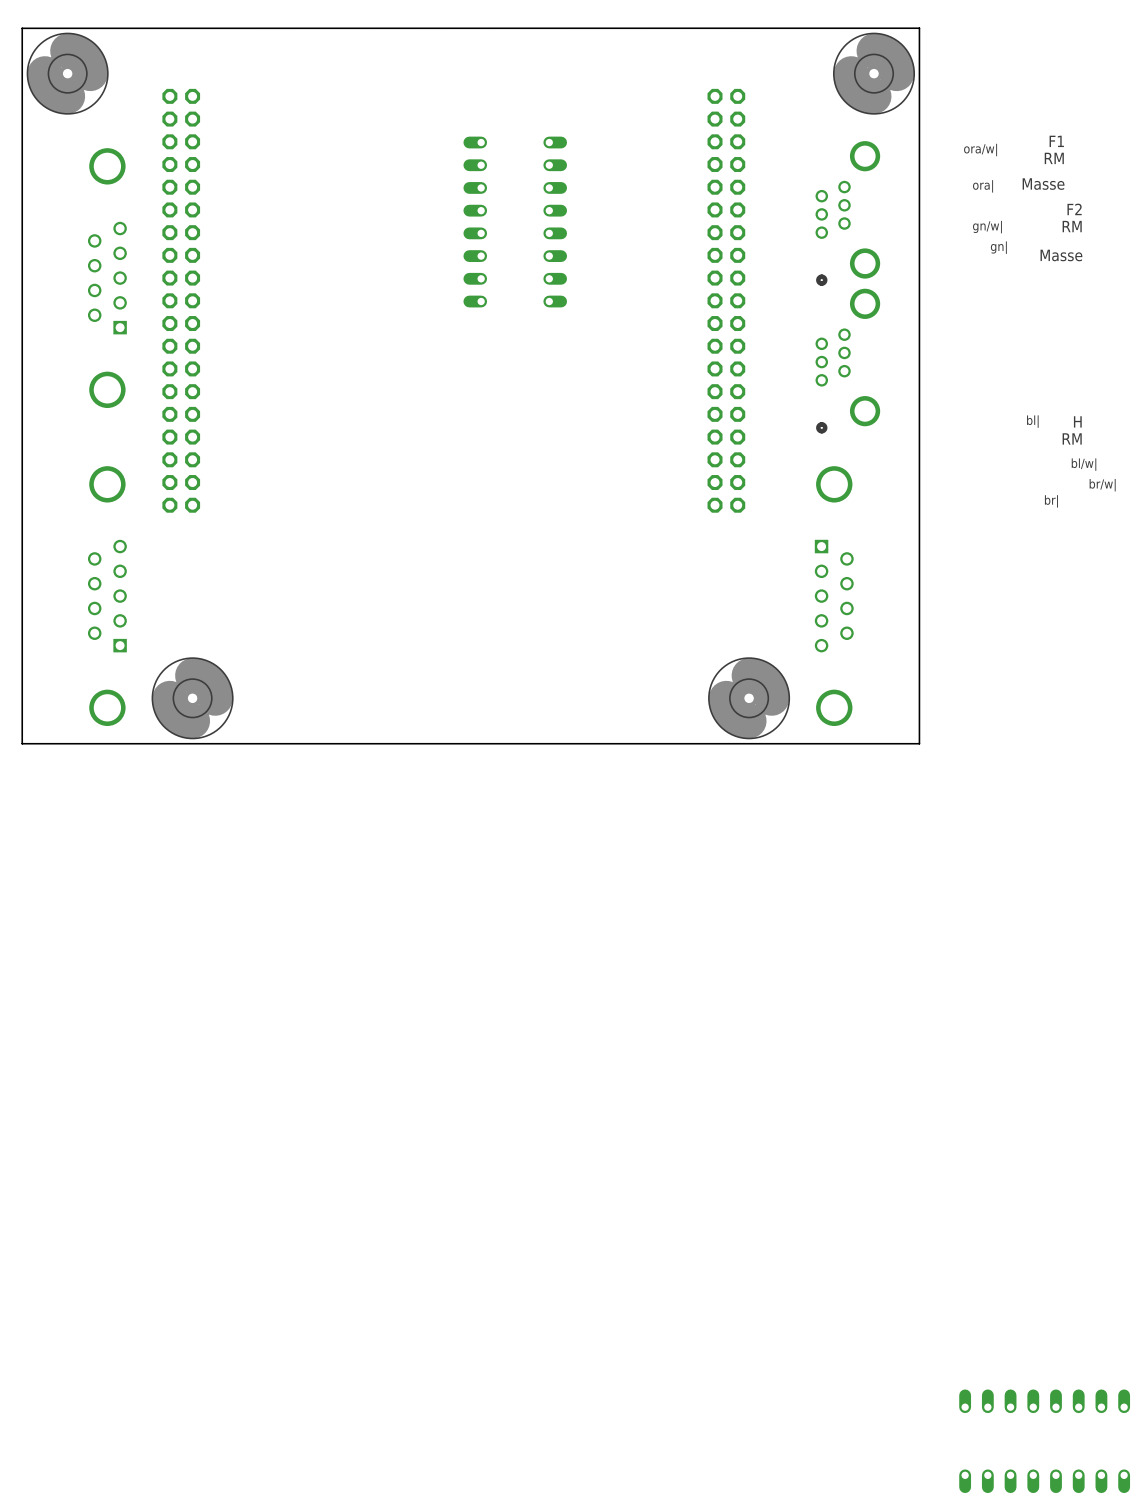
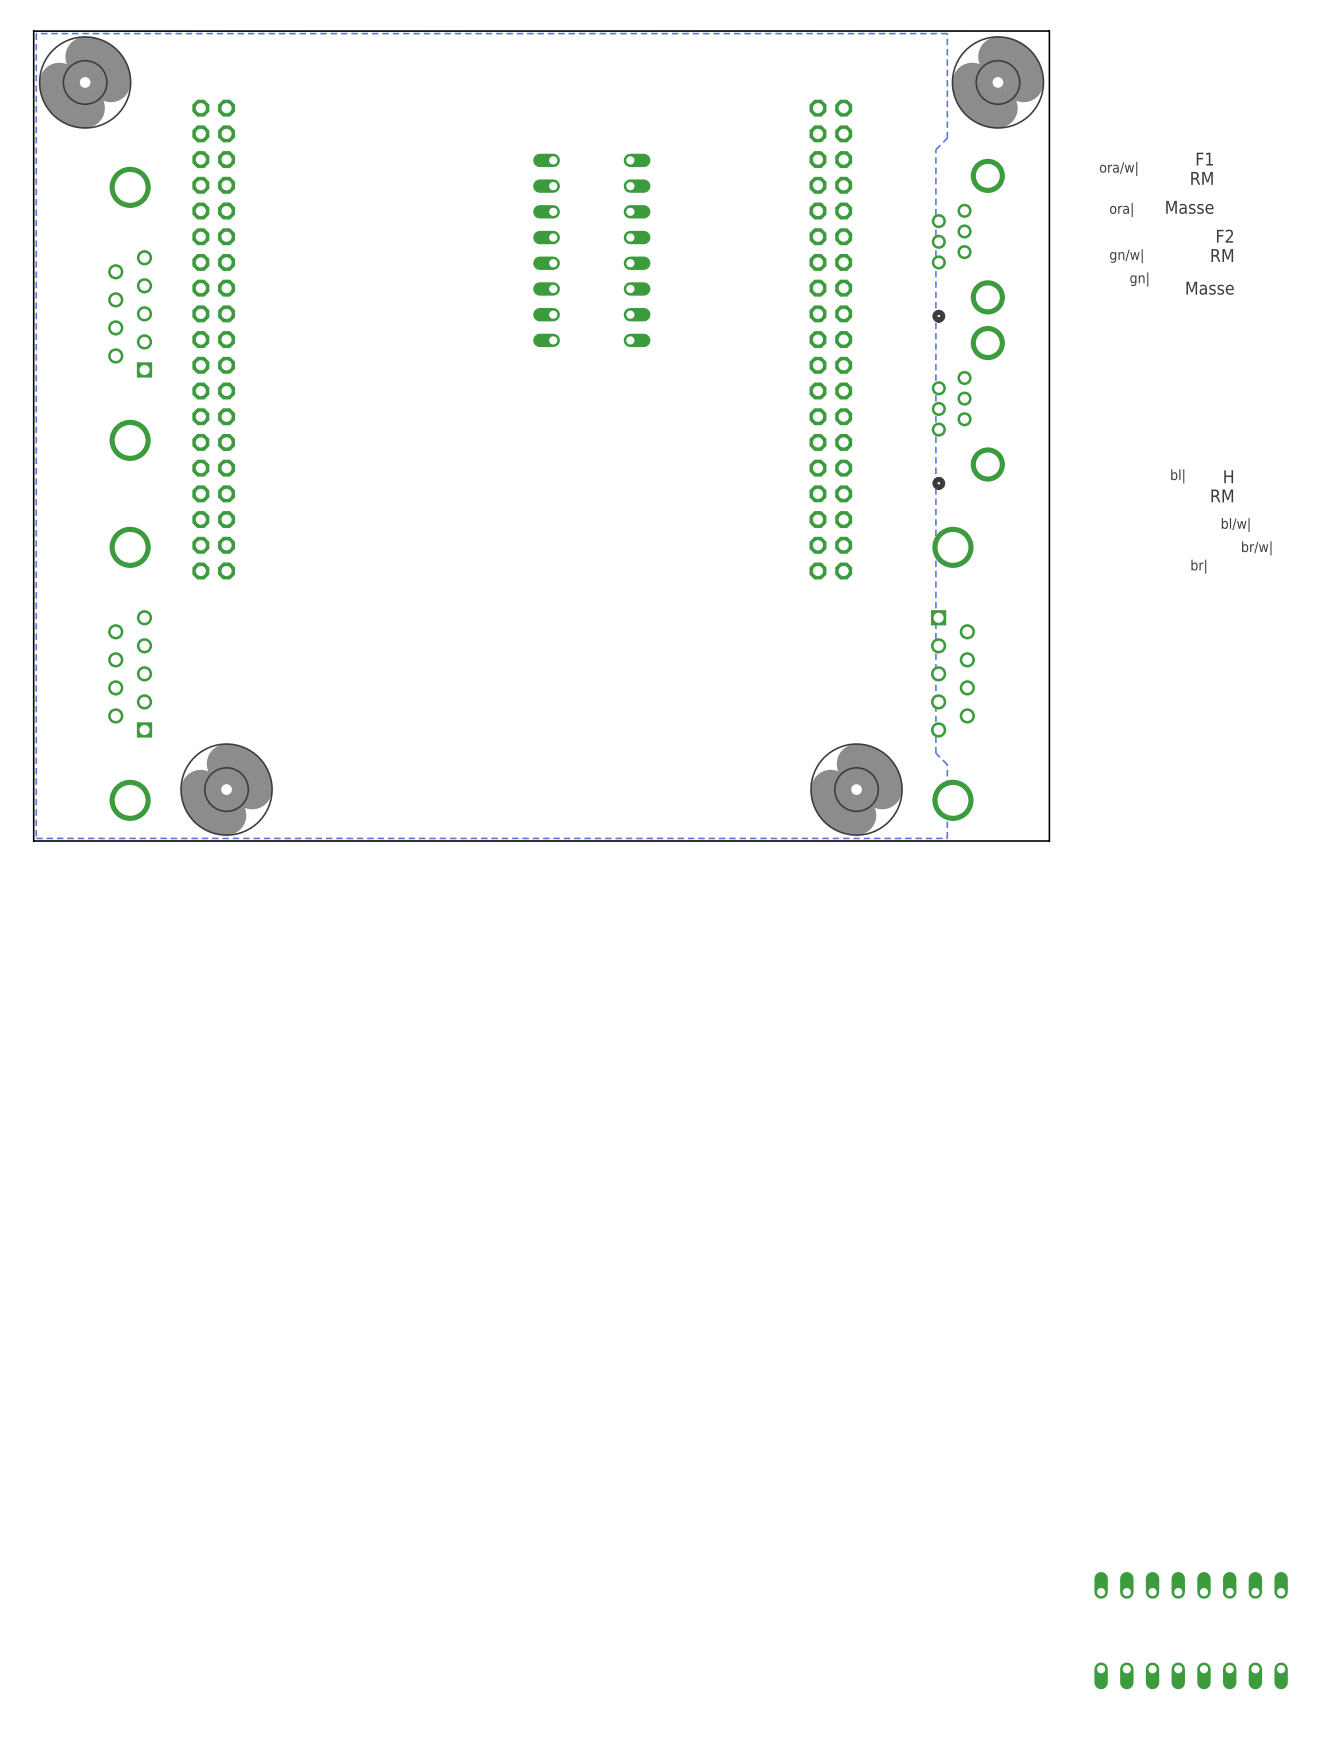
zone outline: none -> (947, 33) (947, 138) (935, 149) (935, 753) (947, 764) (947, 838) (36, 838) (36, 33) (947, 33)

